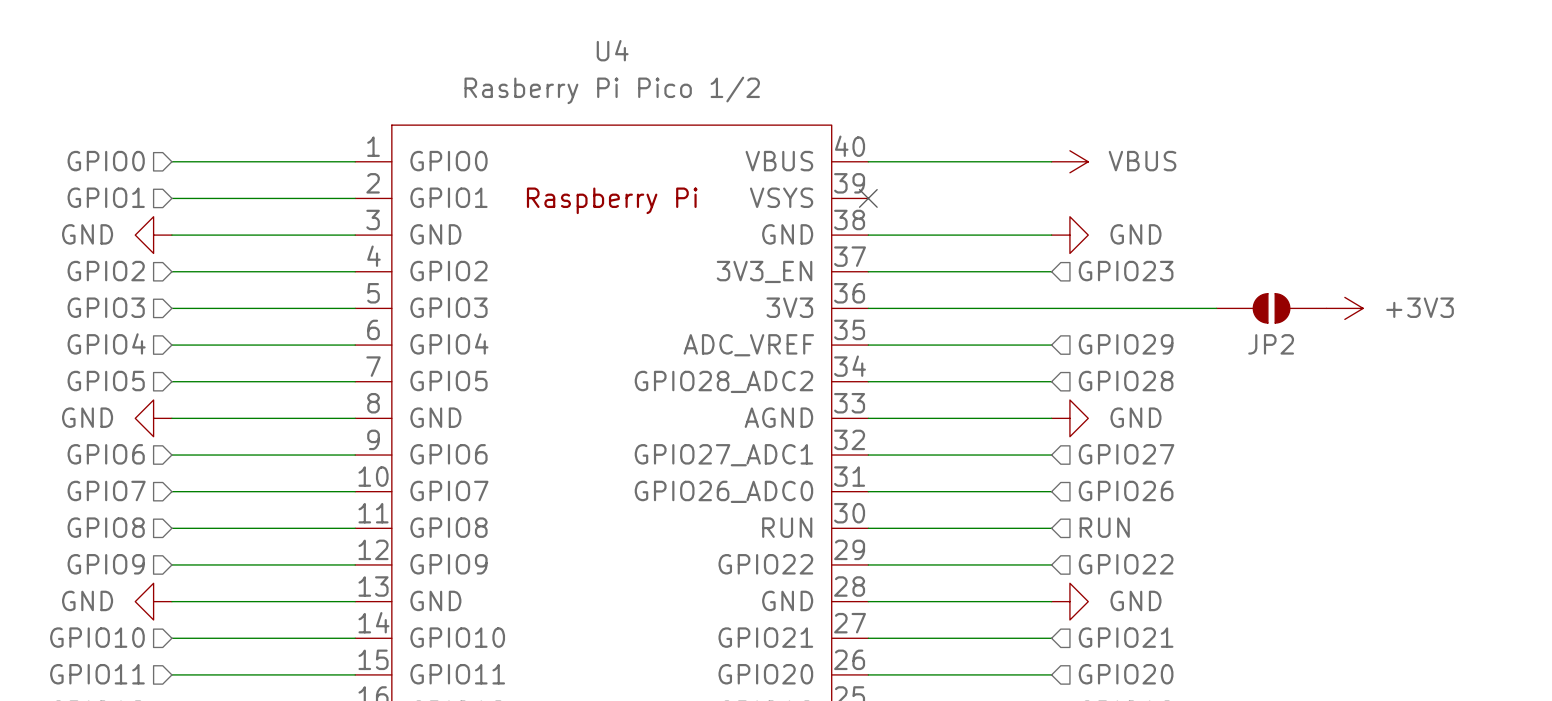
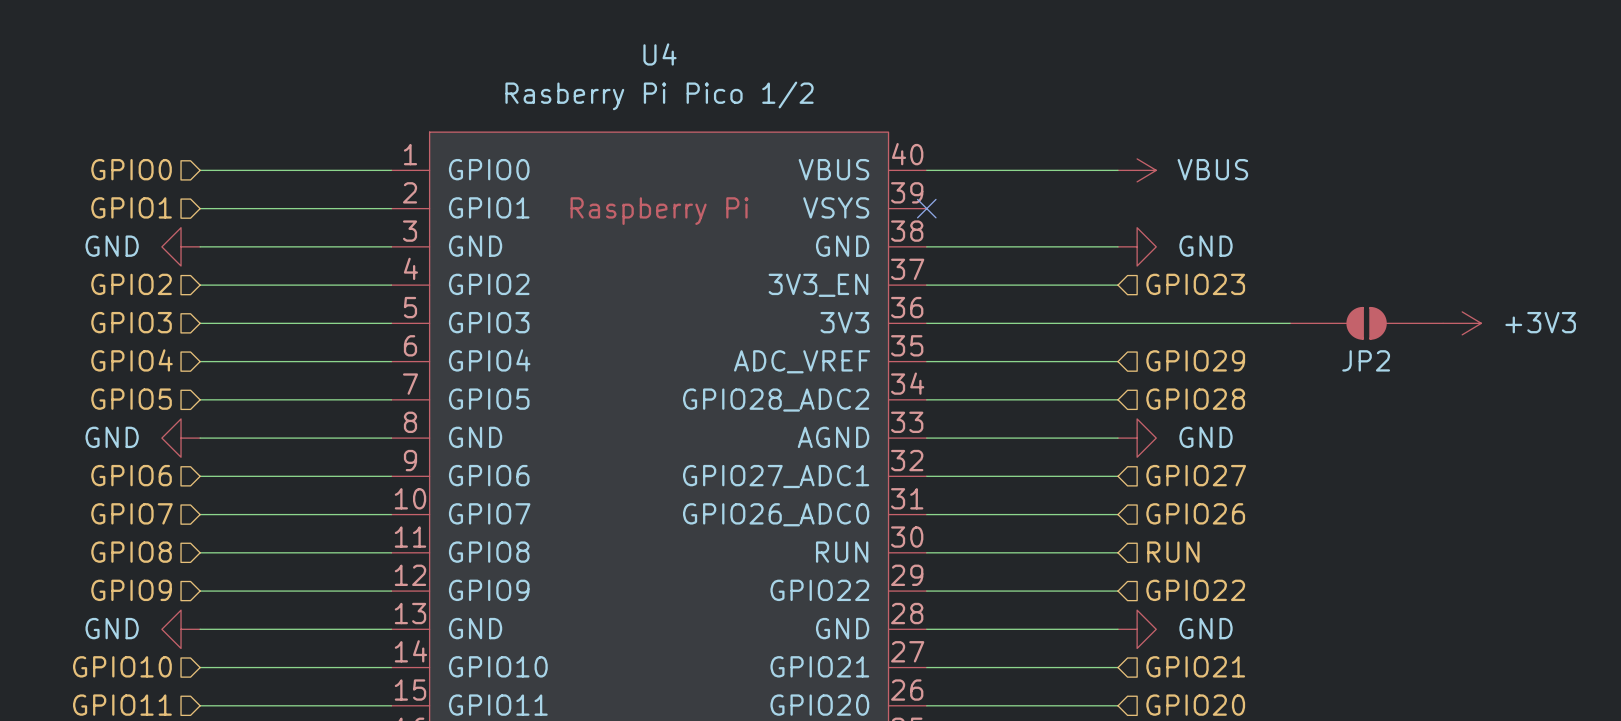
JP2 symbol: [1216, 293, 1327, 324] -> [1290, 306, 1444, 340]
power symbol position: +3V3 (1344, 308) -> +3V3 (1462, 323)

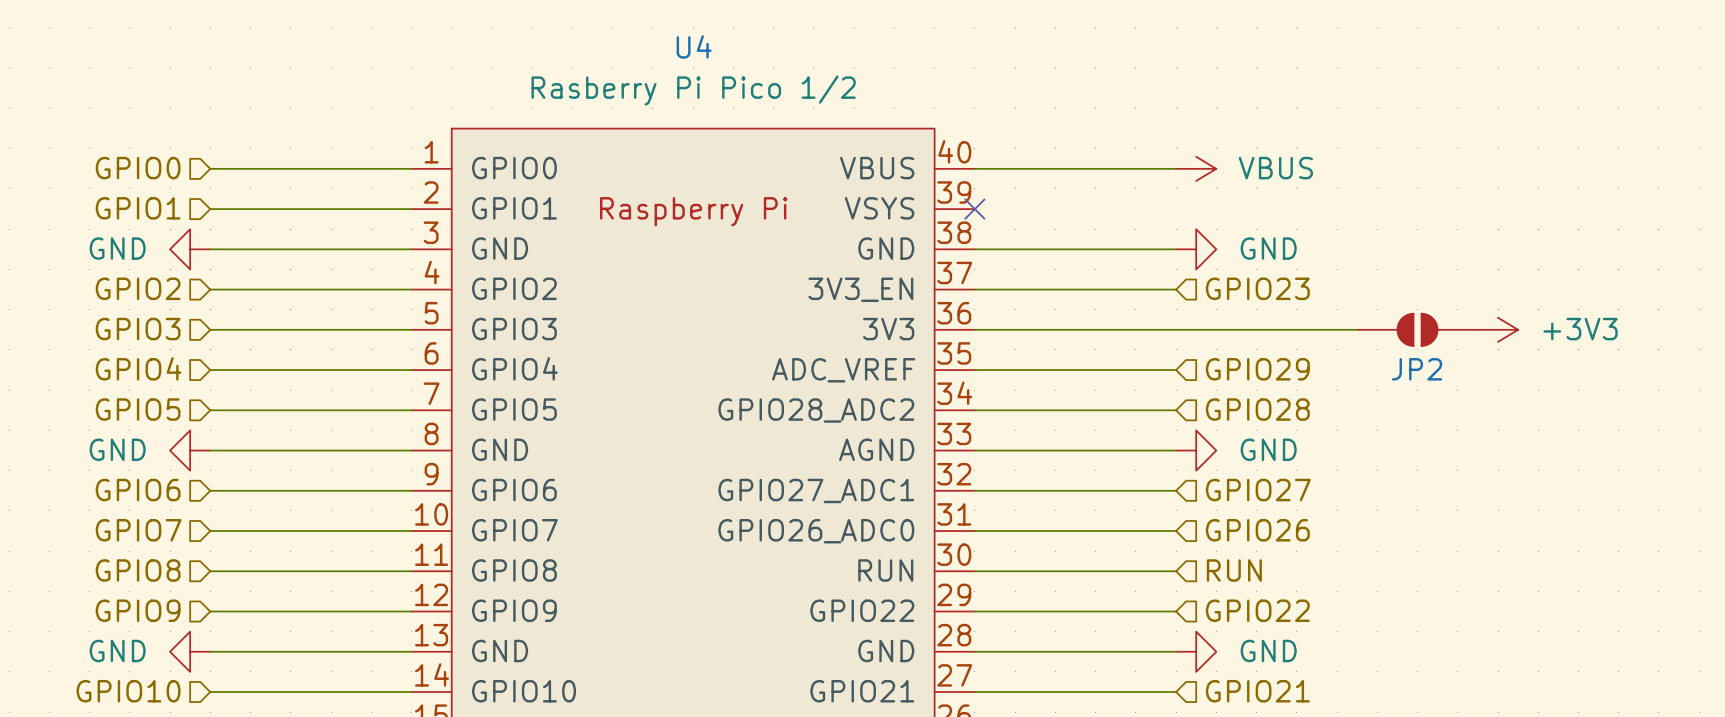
JP2 symbol: [1290, 306, 1444, 340] -> [1357, 313, 1478, 346]
power symbol position: +3V3 (1462, 323) -> +3V3 (1498, 329)

